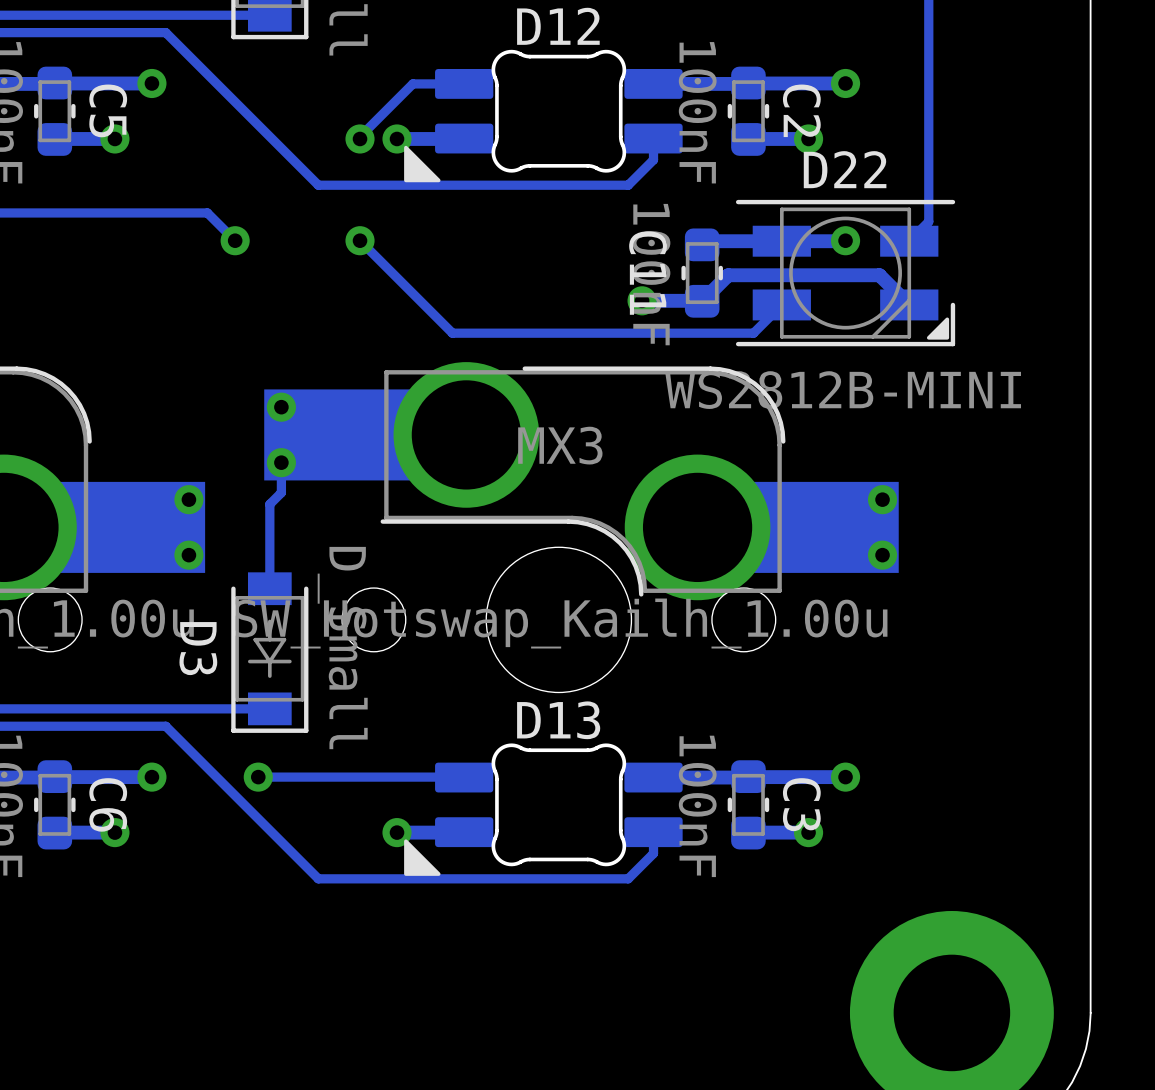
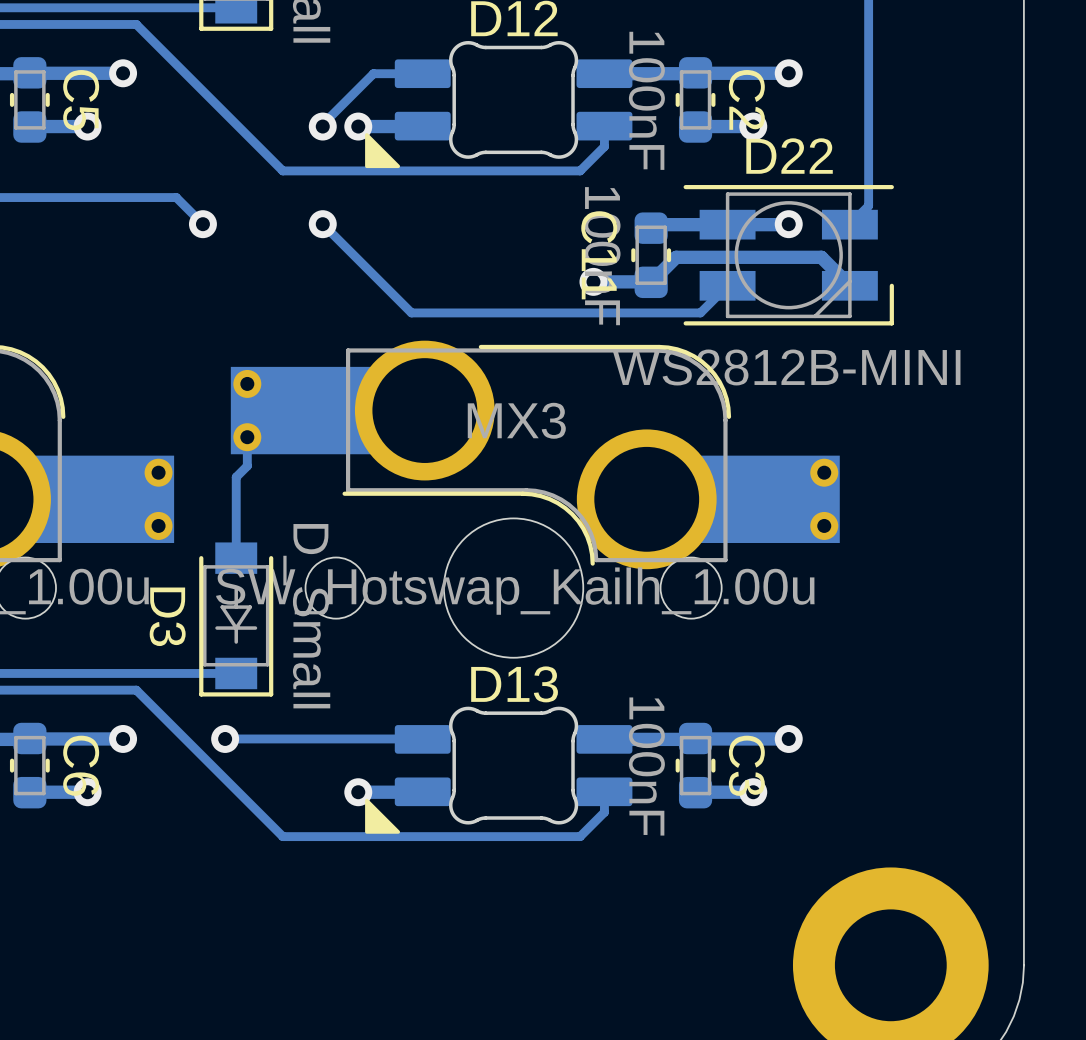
D22 footprint: [735, 199, 956, 347] -> [683, 185, 894, 326]

